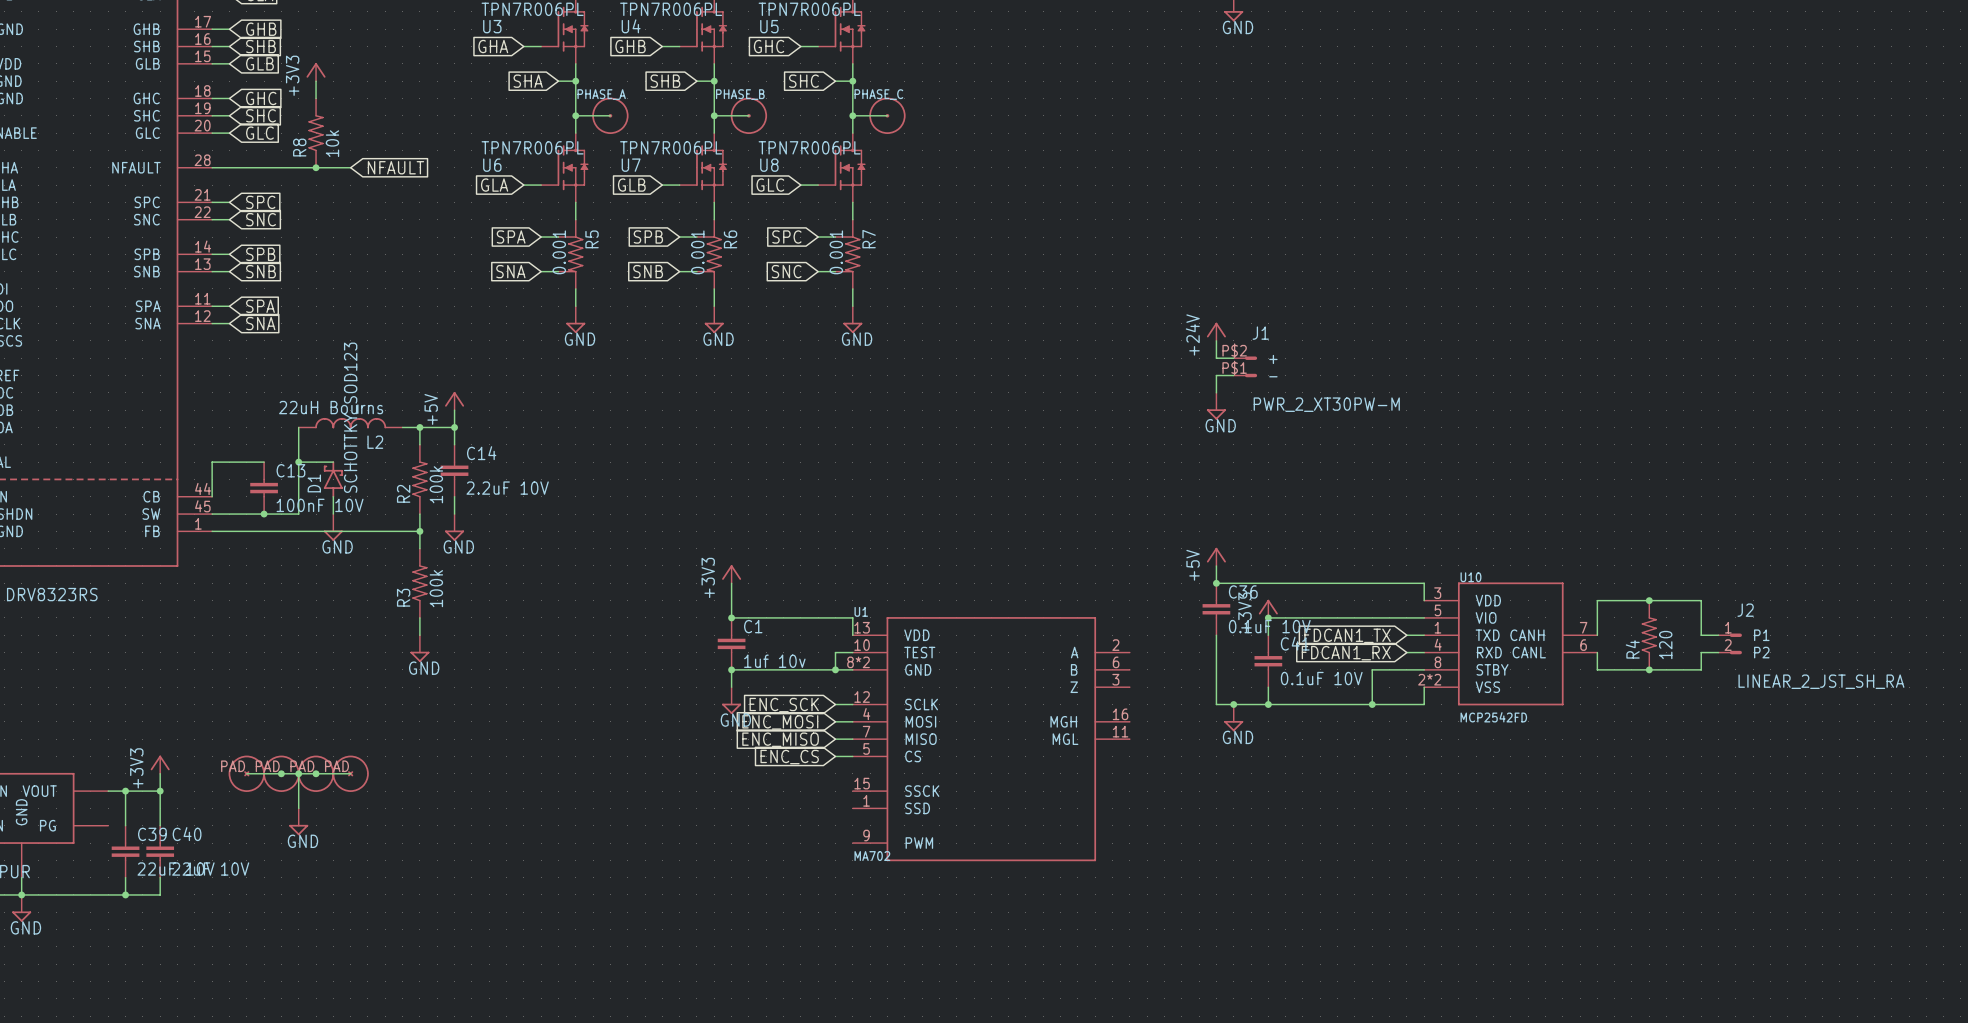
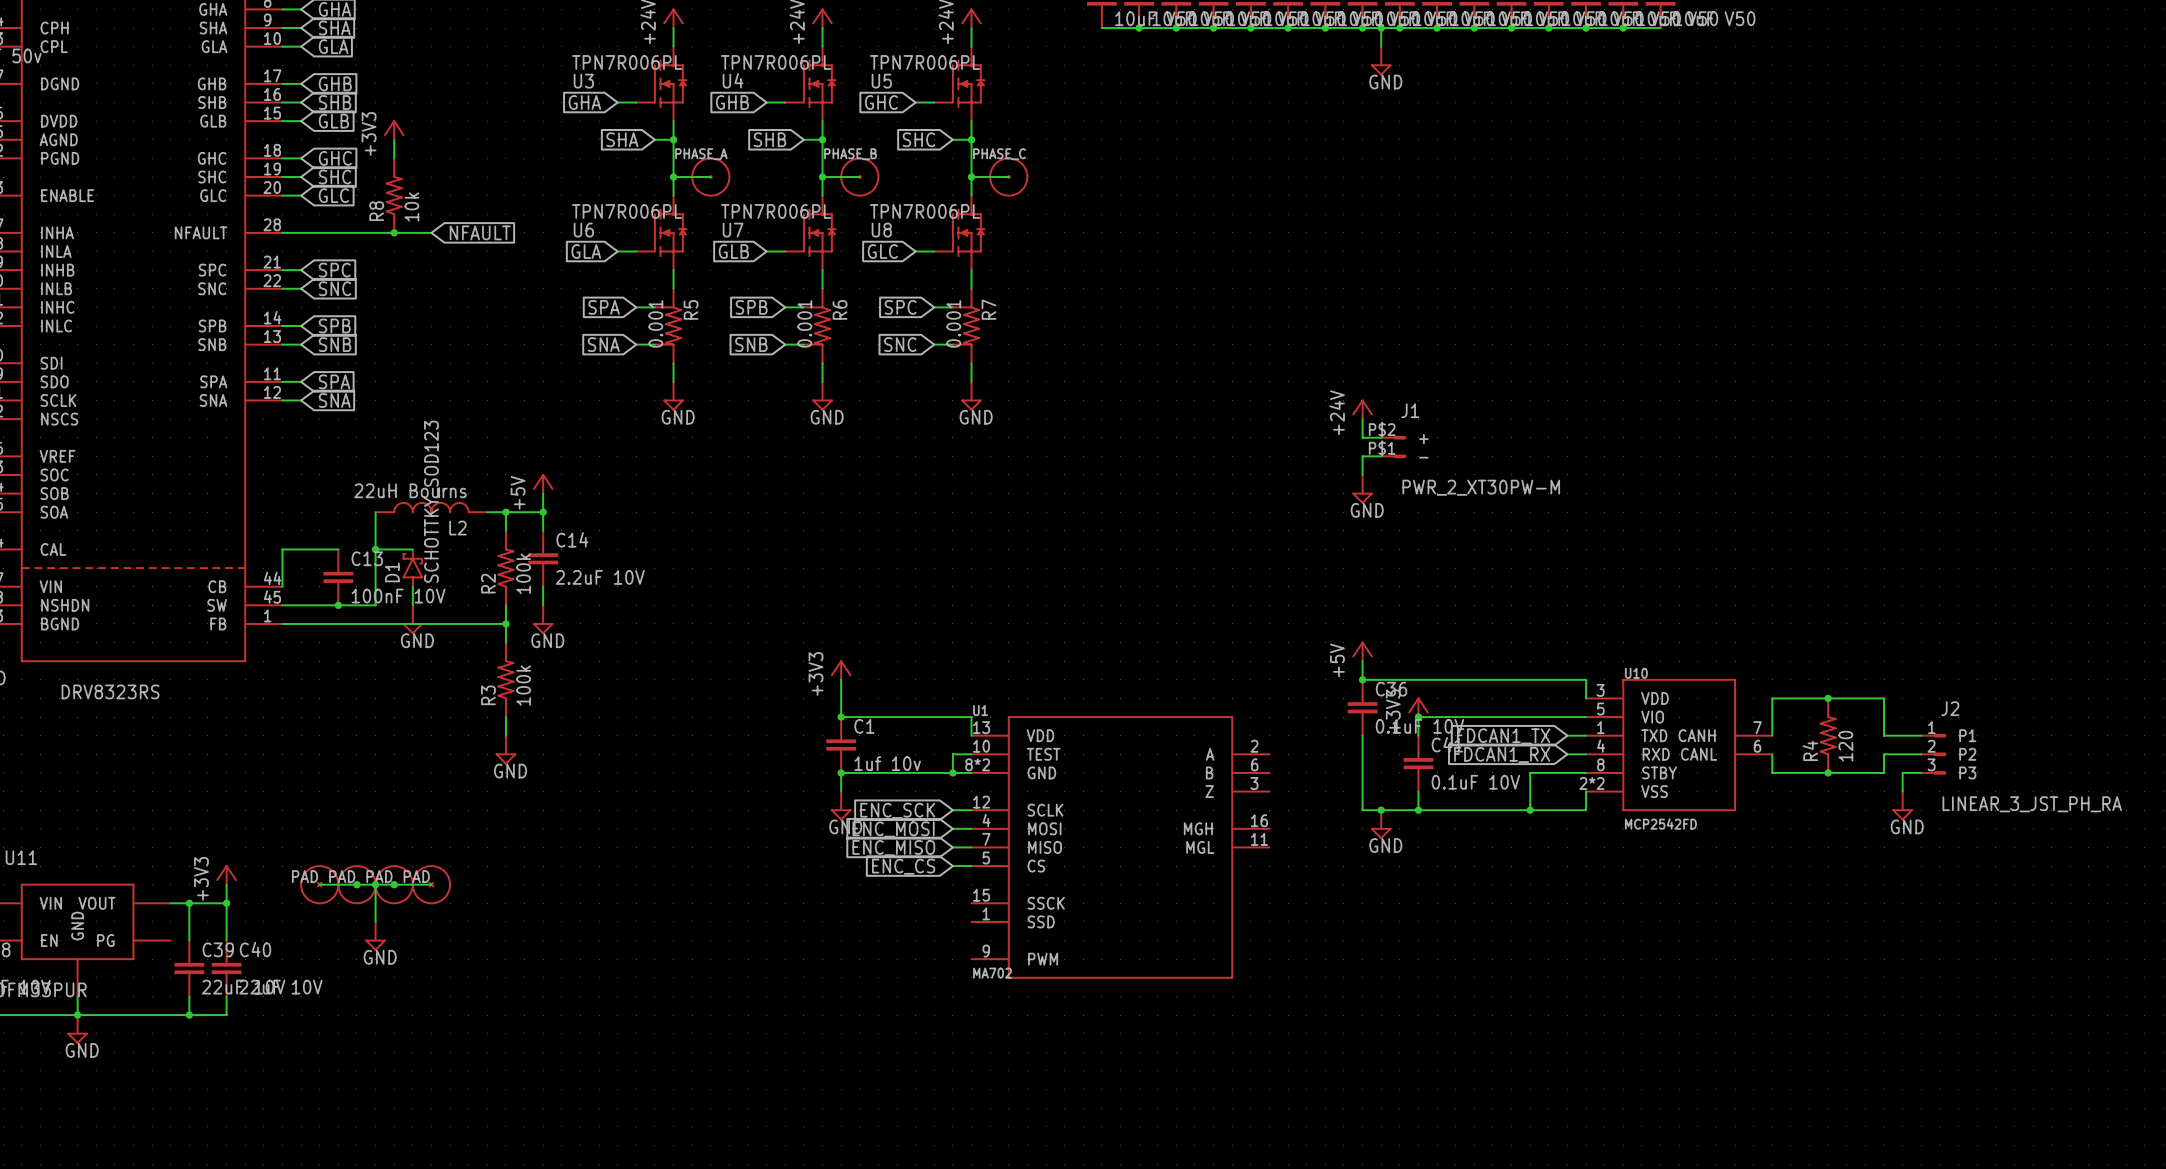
J2 symbol: [1718, 633, 1742, 655] -> [1921, 733, 1947, 775]
wire: none -> (1921, 772) (1902, 772) (1902, 791)
J2 value: LINEAR_2_JST_SH_RA (1821, 681) -> LINEAR_3_JST_PH_RA (2032, 804)
power symbol: none -> GND (1902, 806)

